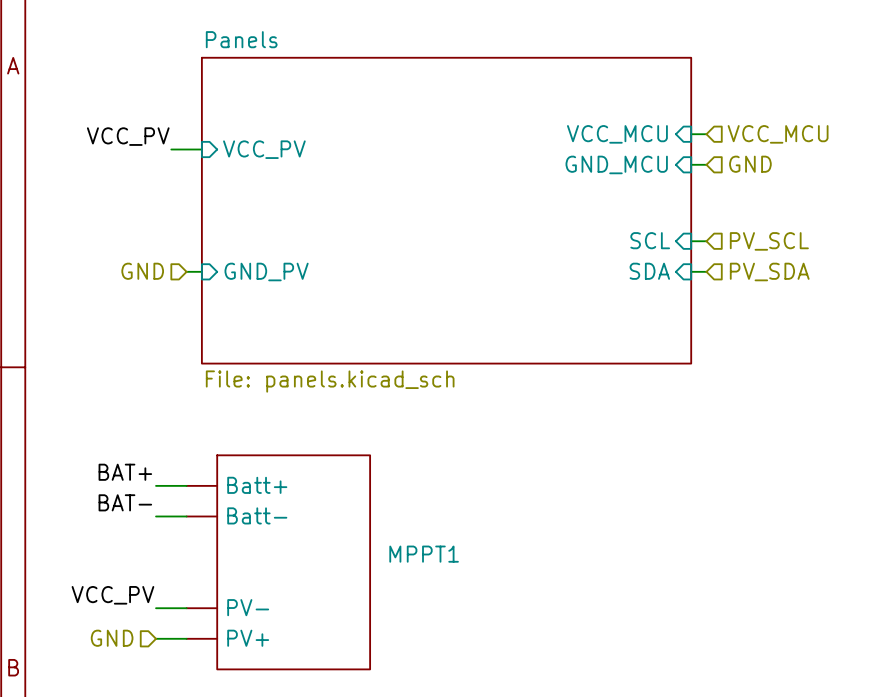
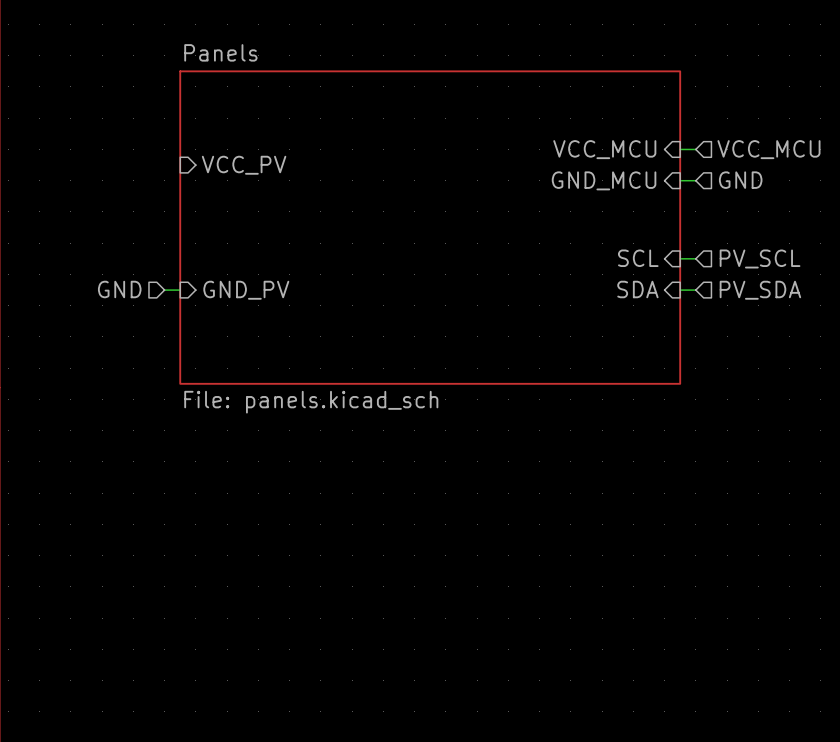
label: VCC_PV (128, 136) -> none
wire: (171, 149) (201, 149) -> none
label: BAT+ (125, 472) -> none
wire: (156, 485) (186, 485) -> none
label: BAT- (125, 502) -> none
wire: (156, 516) (186, 516) -> none
MPPT1: (278, 562) -> none
label: VCC_PV (112, 595) -> none
wire: (156, 608) (186, 608) -> none
hierarchical label: GND (112, 638) -> none
wire: (156, 638) (186, 638) -> none

